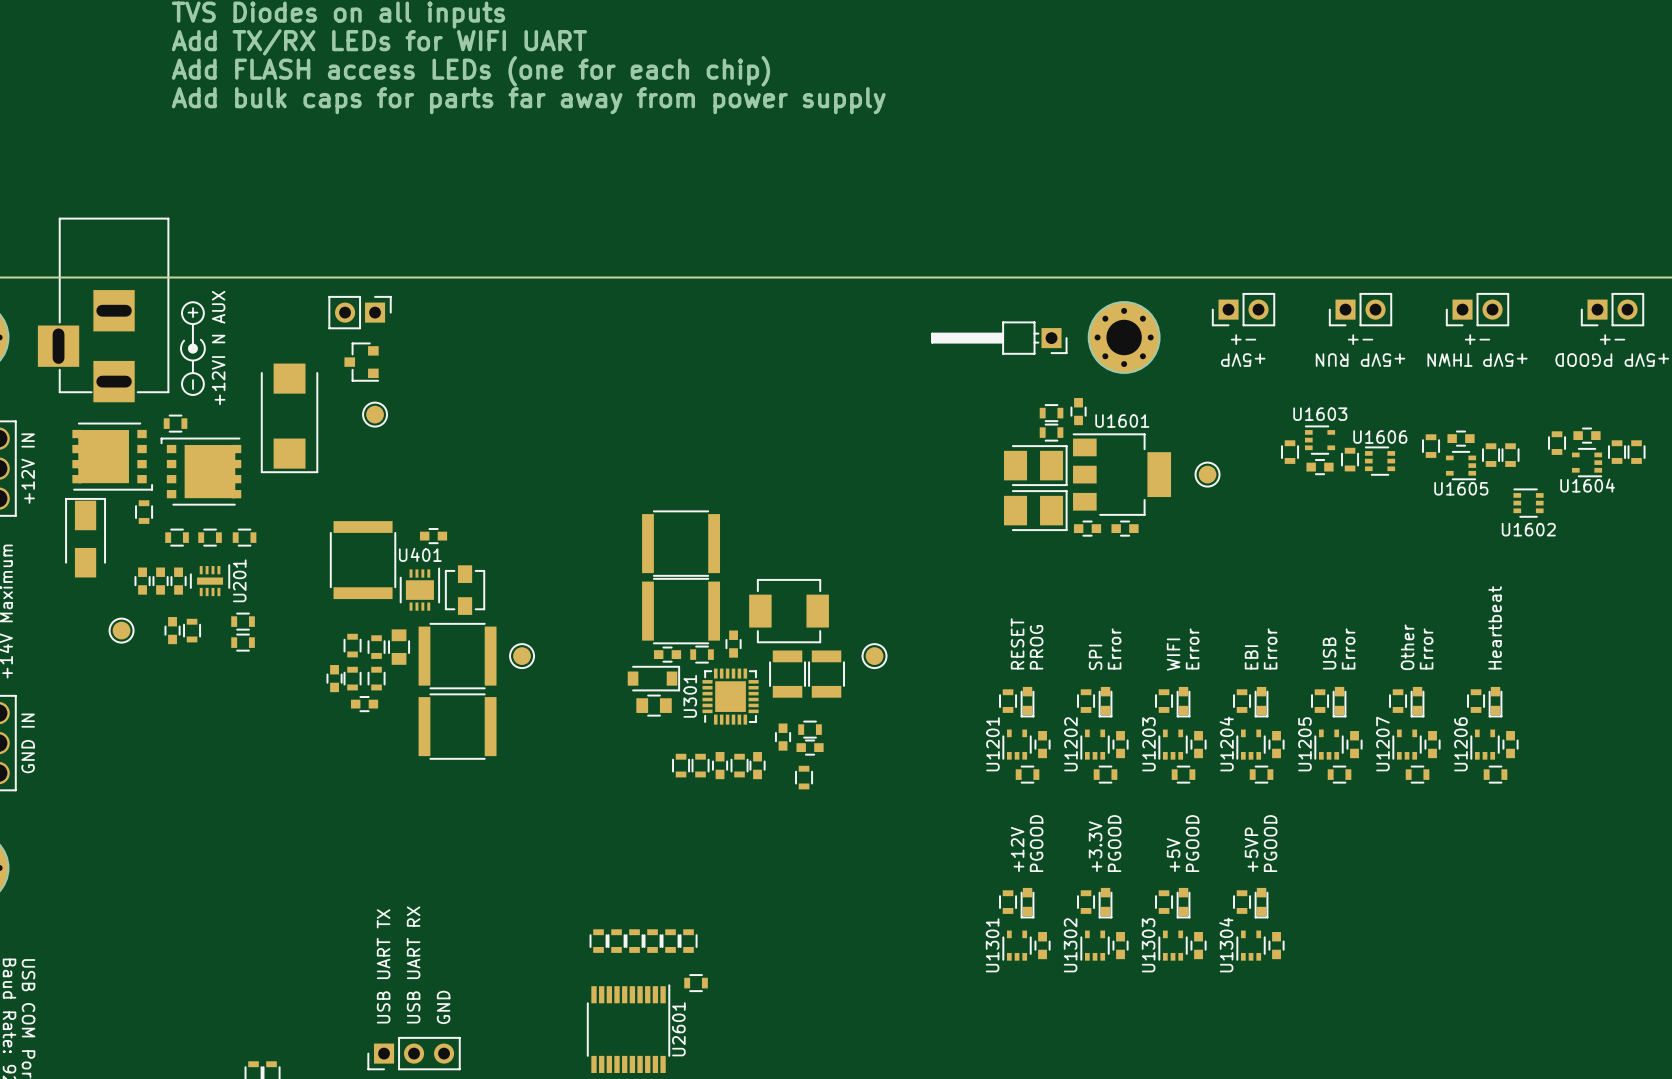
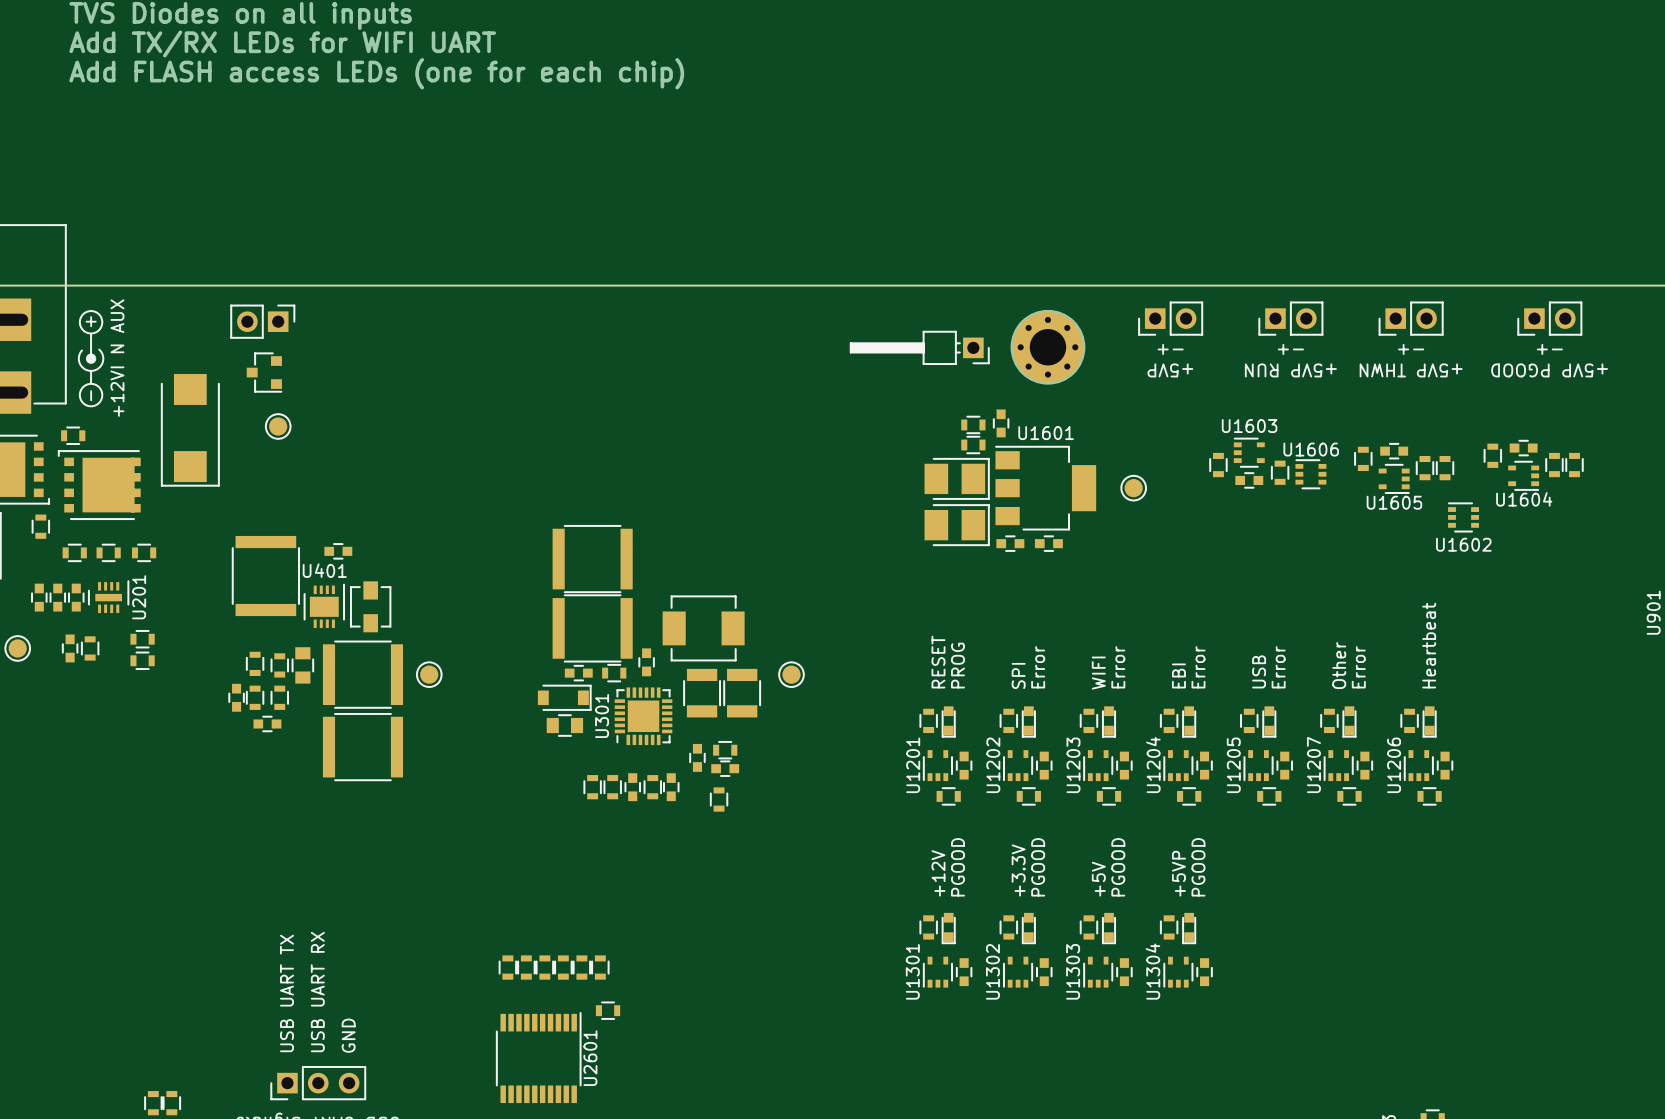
text: Add bulk caps for parts far away from power supply (528, 100) -> none

